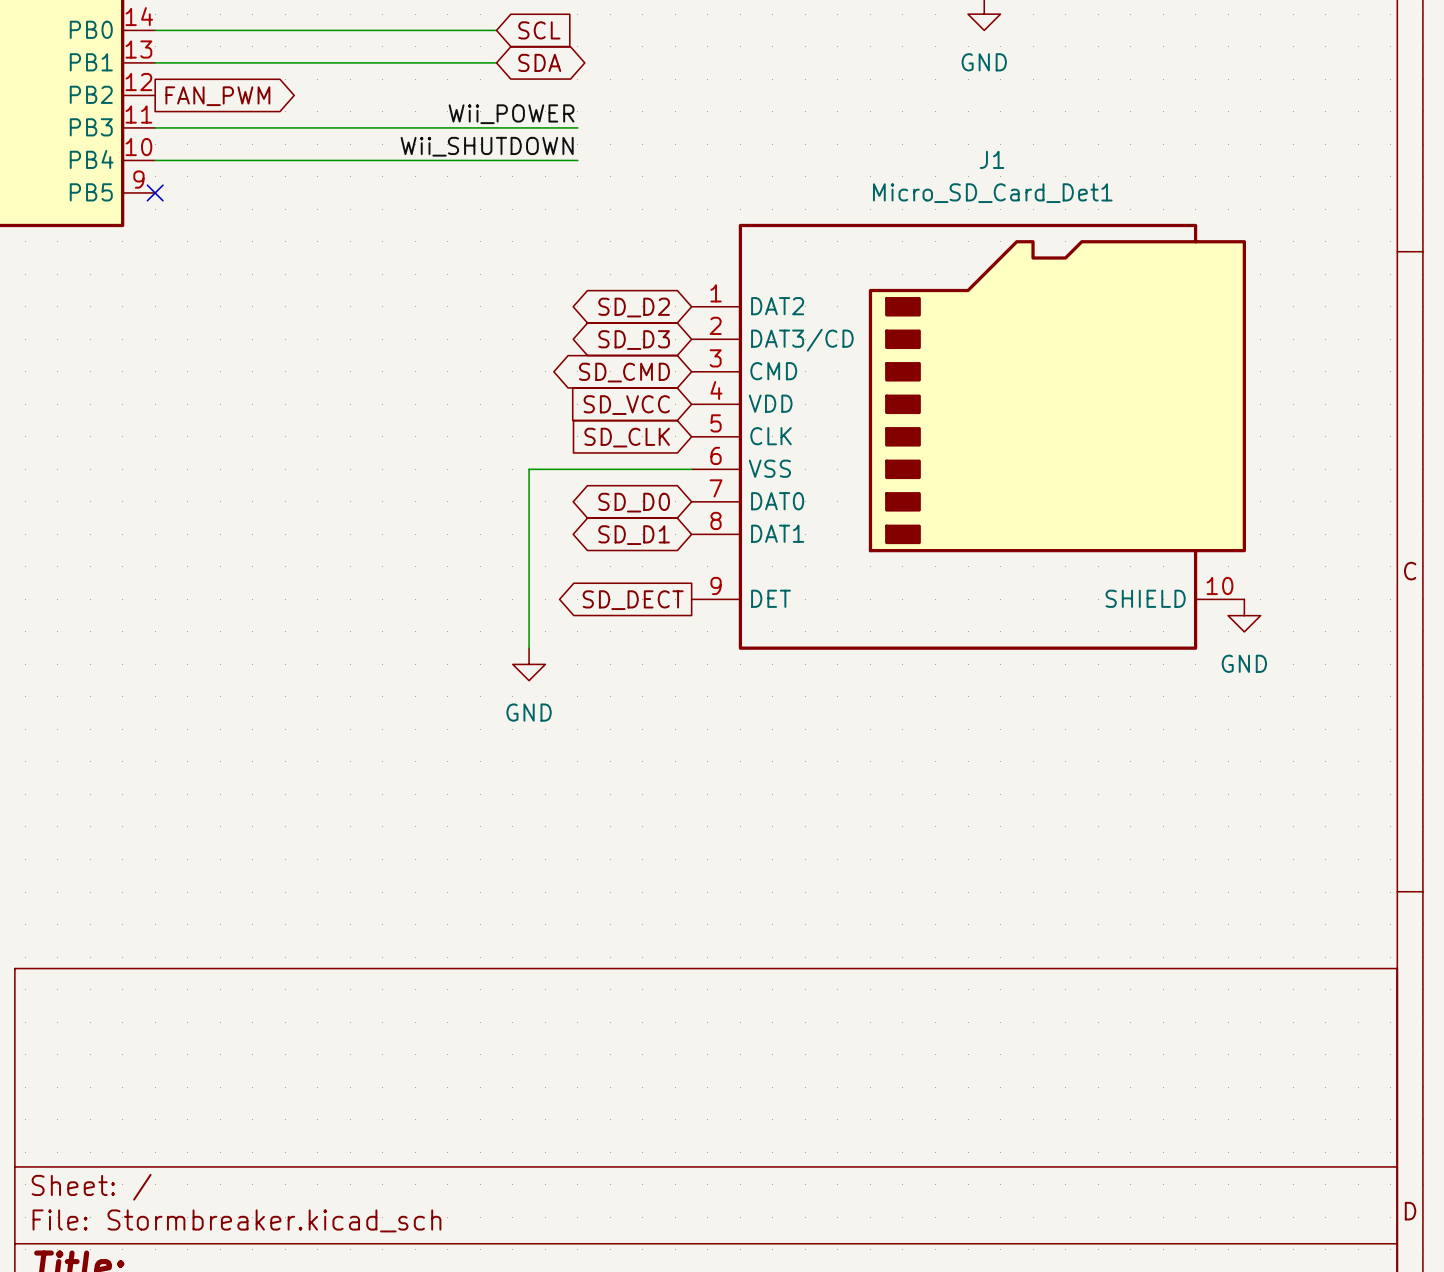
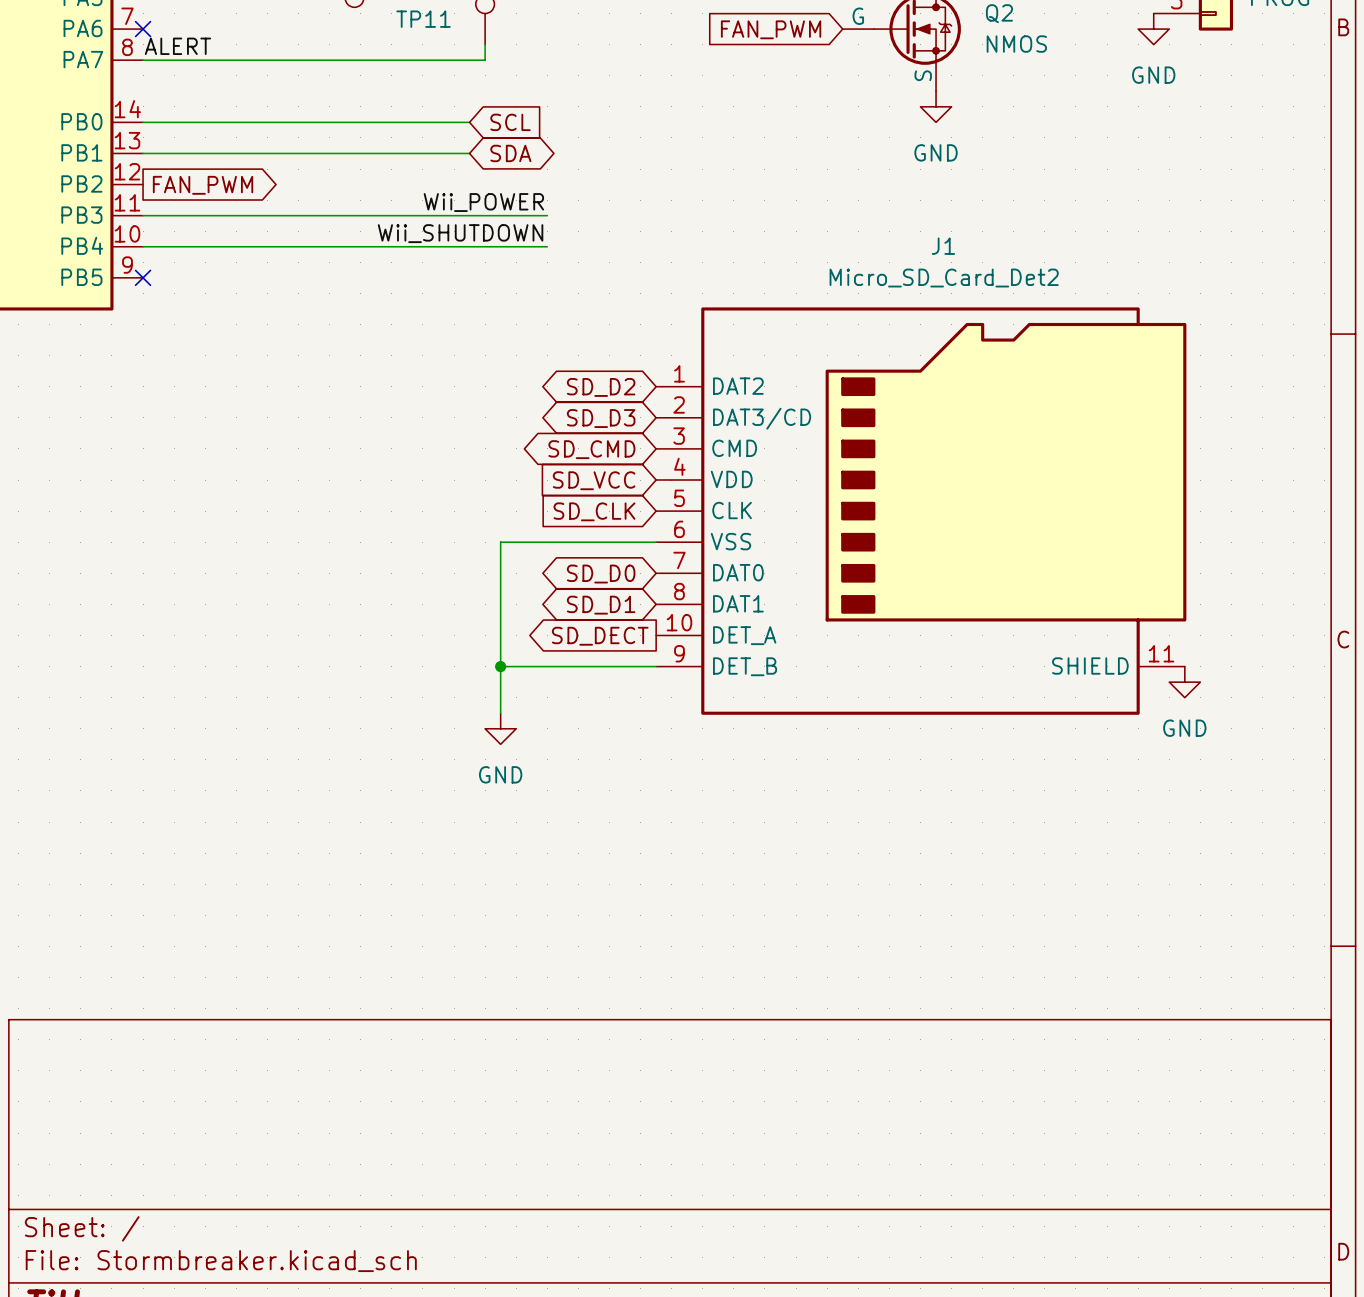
J1 value: Micro_SD_Card_Det1 (992, 193) -> Micro_SD_Card_Det2 (944, 278)
J1 symbol: [691, 223, 1246, 650] -> [656, 307, 1187, 715]
wire: none -> (500, 666) (656, 666)
junction: none -> (500, 666)
global label position: SD_DECT (633, 600) -> SD_DECT (600, 636)

